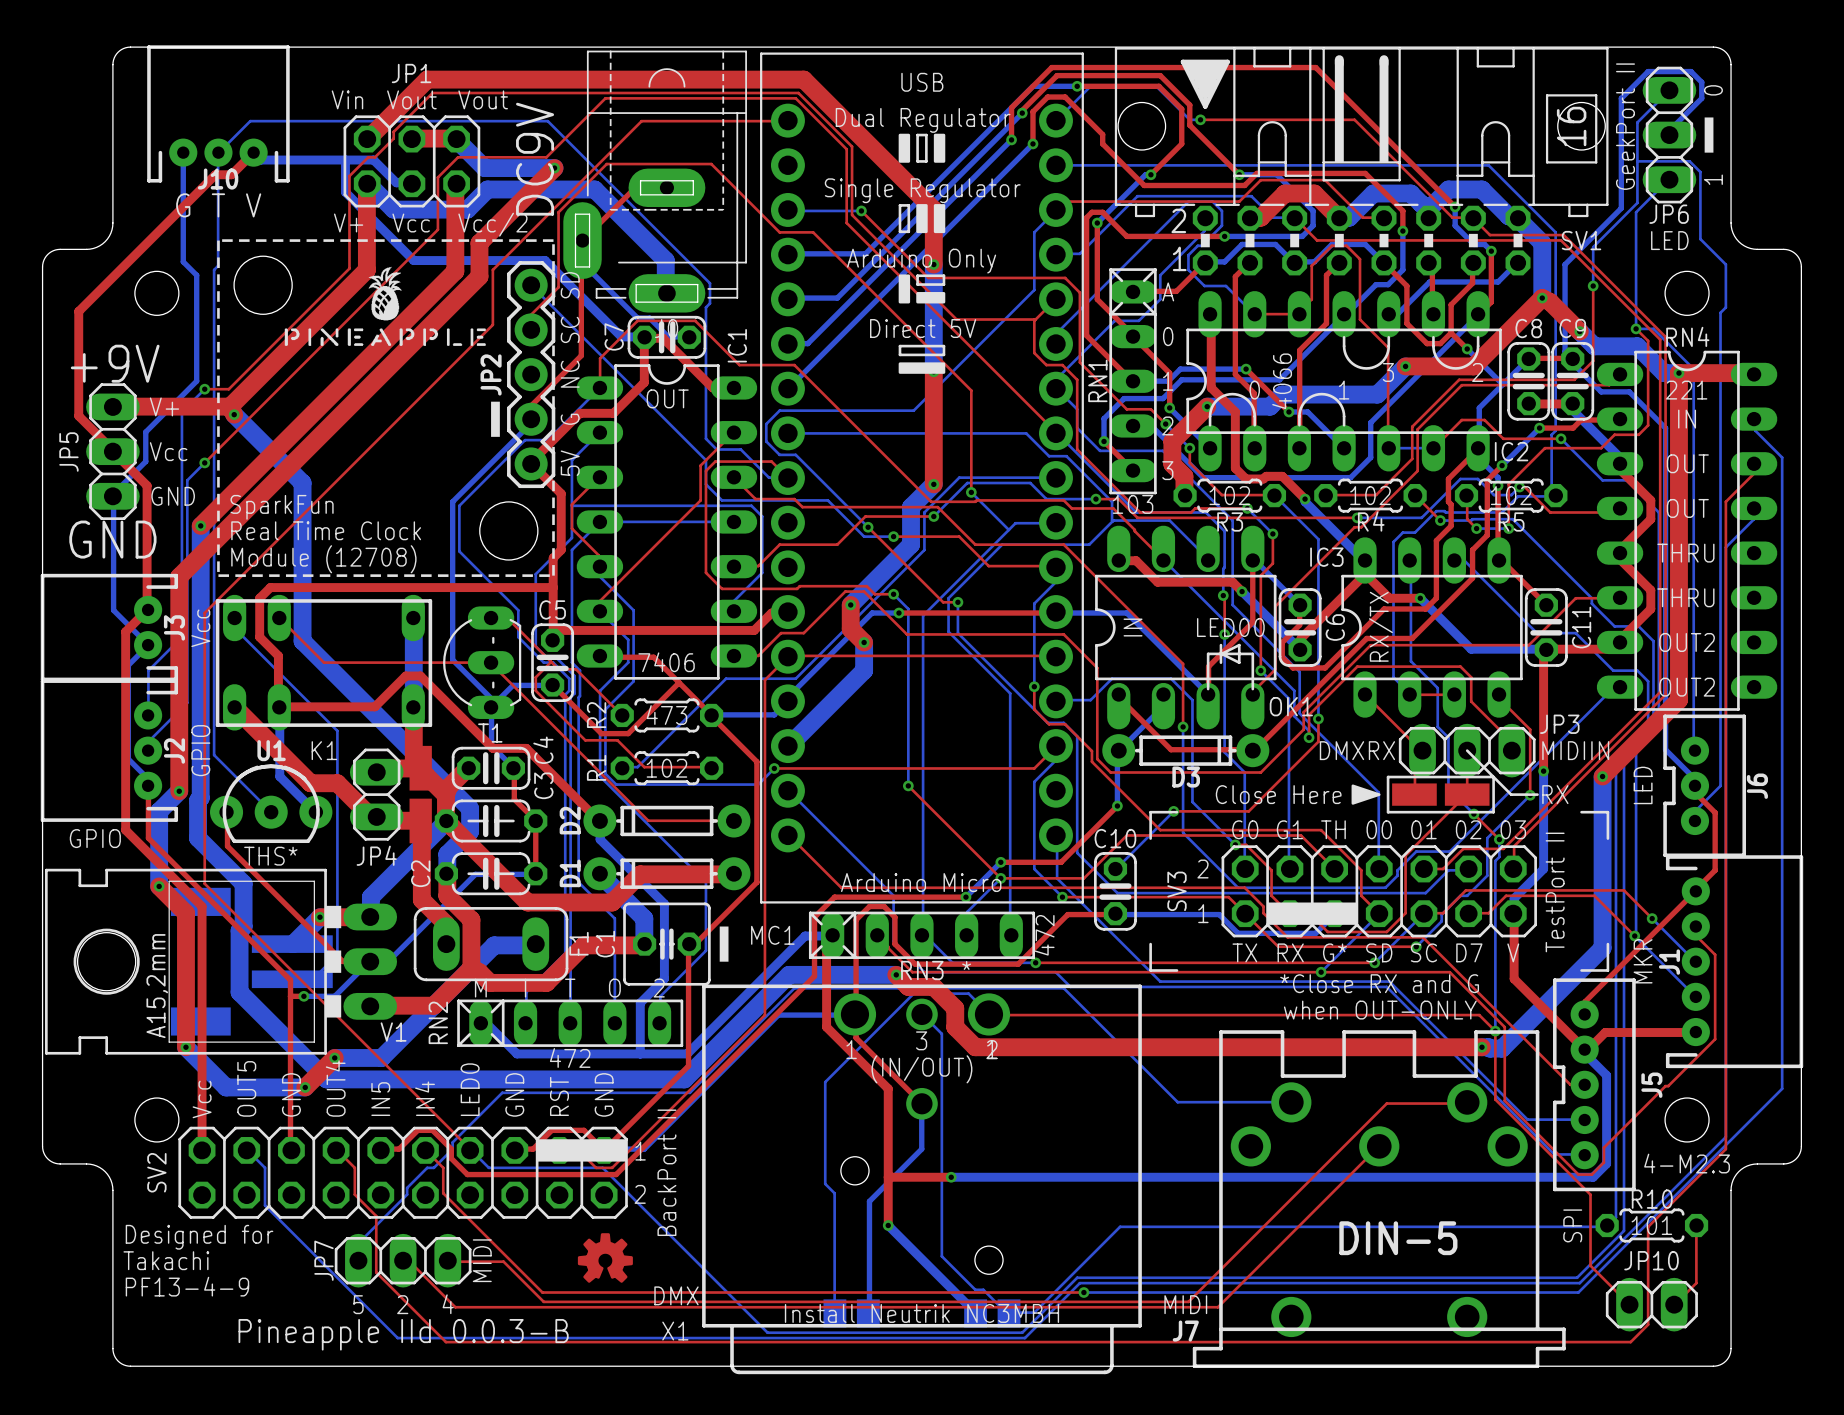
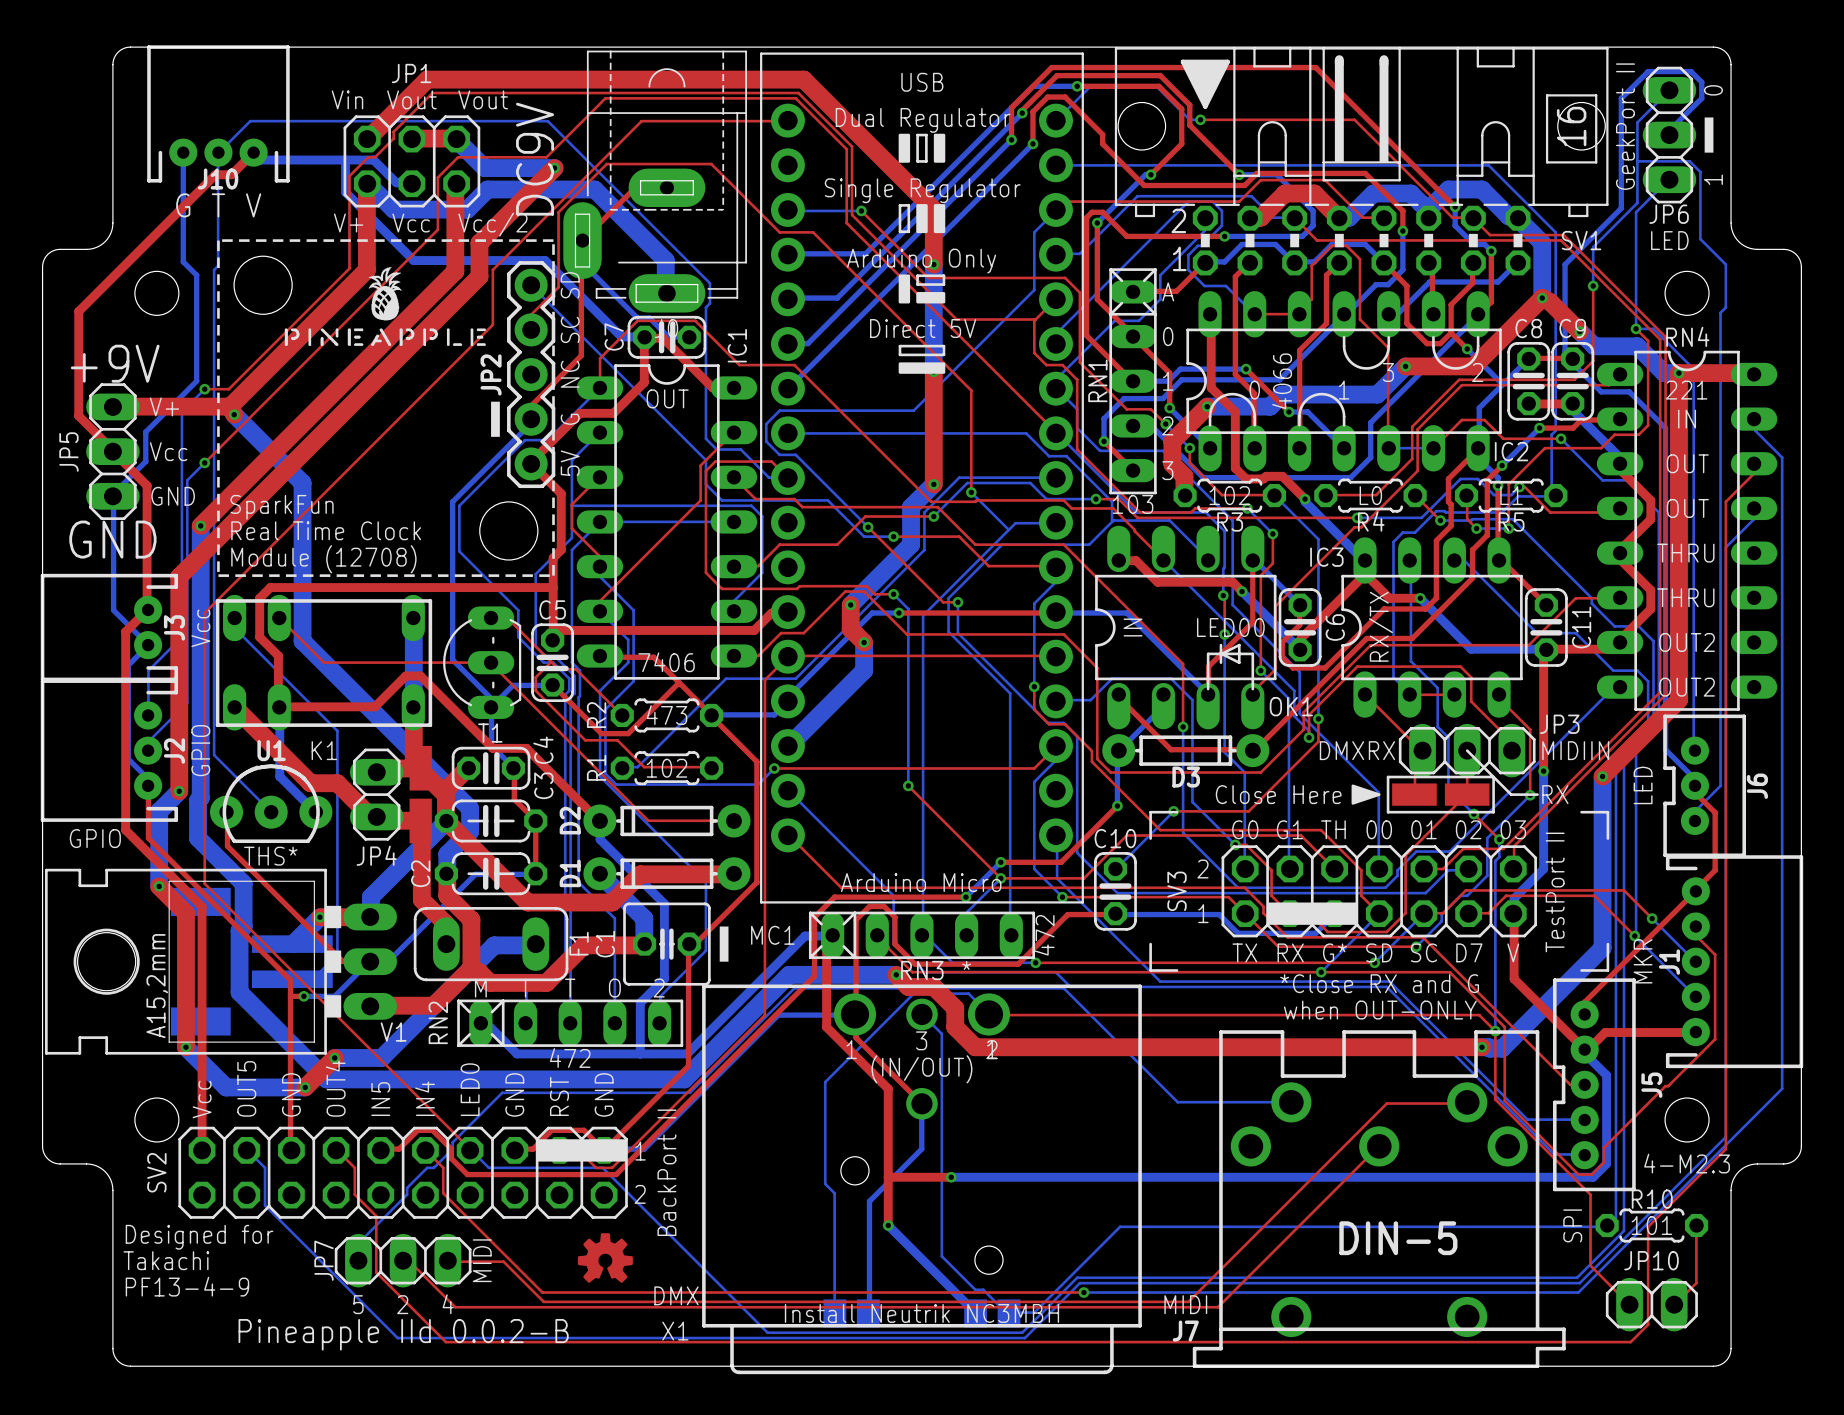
text: 102 (1370, 495) -> L0 (1370, 495)
text: 102 (1511, 495) -> L1 (1511, 495)
text: Pineapple IId 0.0.3-B (403, 1334) -> Pineapple IId 0.0.2-B (403, 1334)

